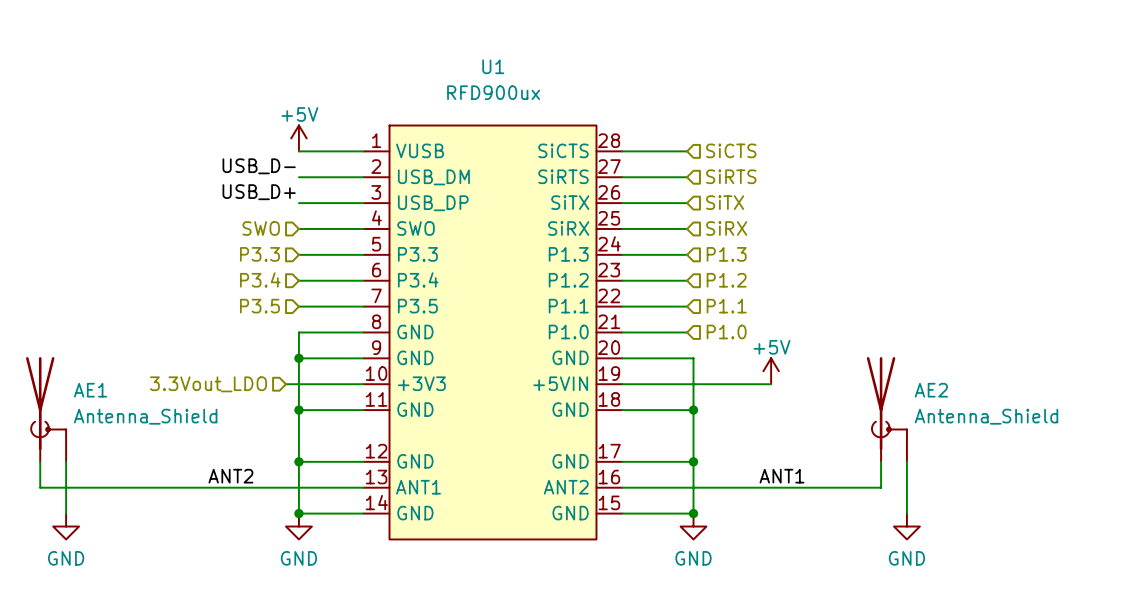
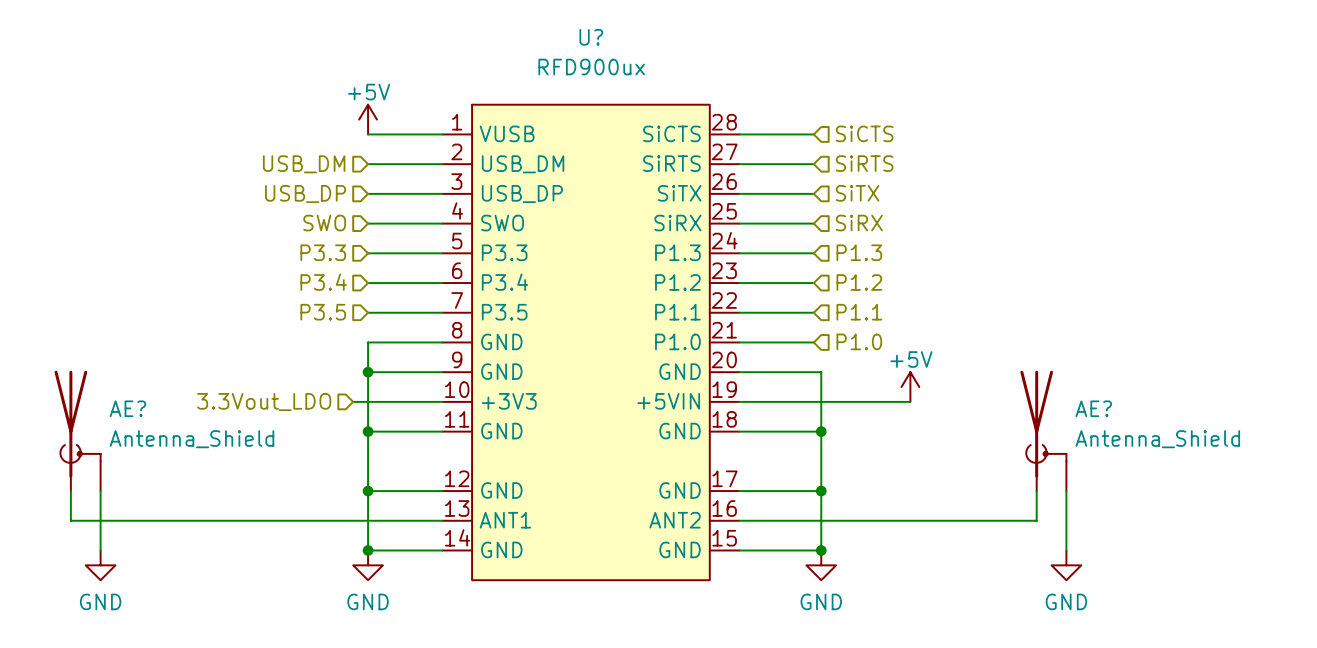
U1 name: U1 (493, 66) -> U? (591, 37)
label: USB_D- (259, 166) -> none
hierarchical label: none -> USB_DM (304, 164)
label: USB_D+ (259, 192) -> none
hierarchical label: none -> USB_DP (305, 194)
AE1 name: AE1 (90, 390) -> AE? (127, 408)
AE2 name: AE2 (931, 390) -> AE? (1093, 408)
label: ANT2 (230, 476) -> none
label: ANT1 (781, 476) -> none

